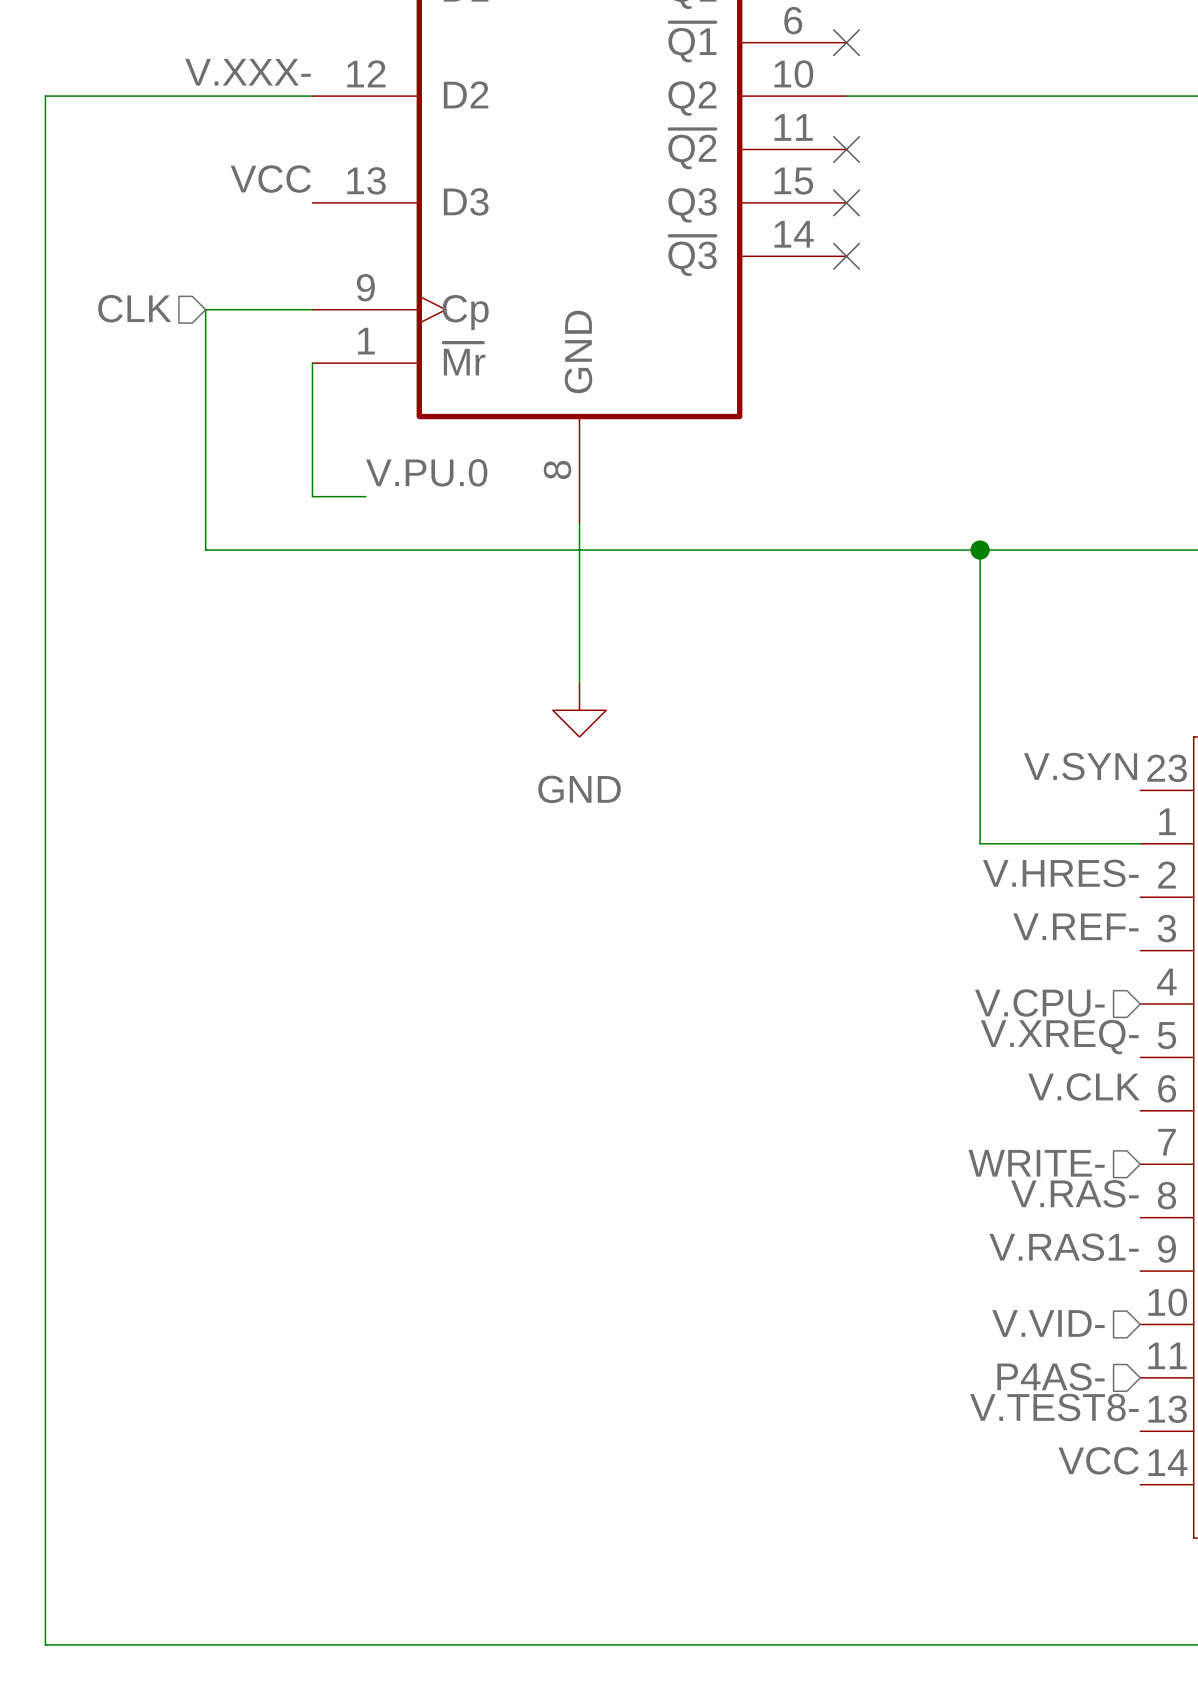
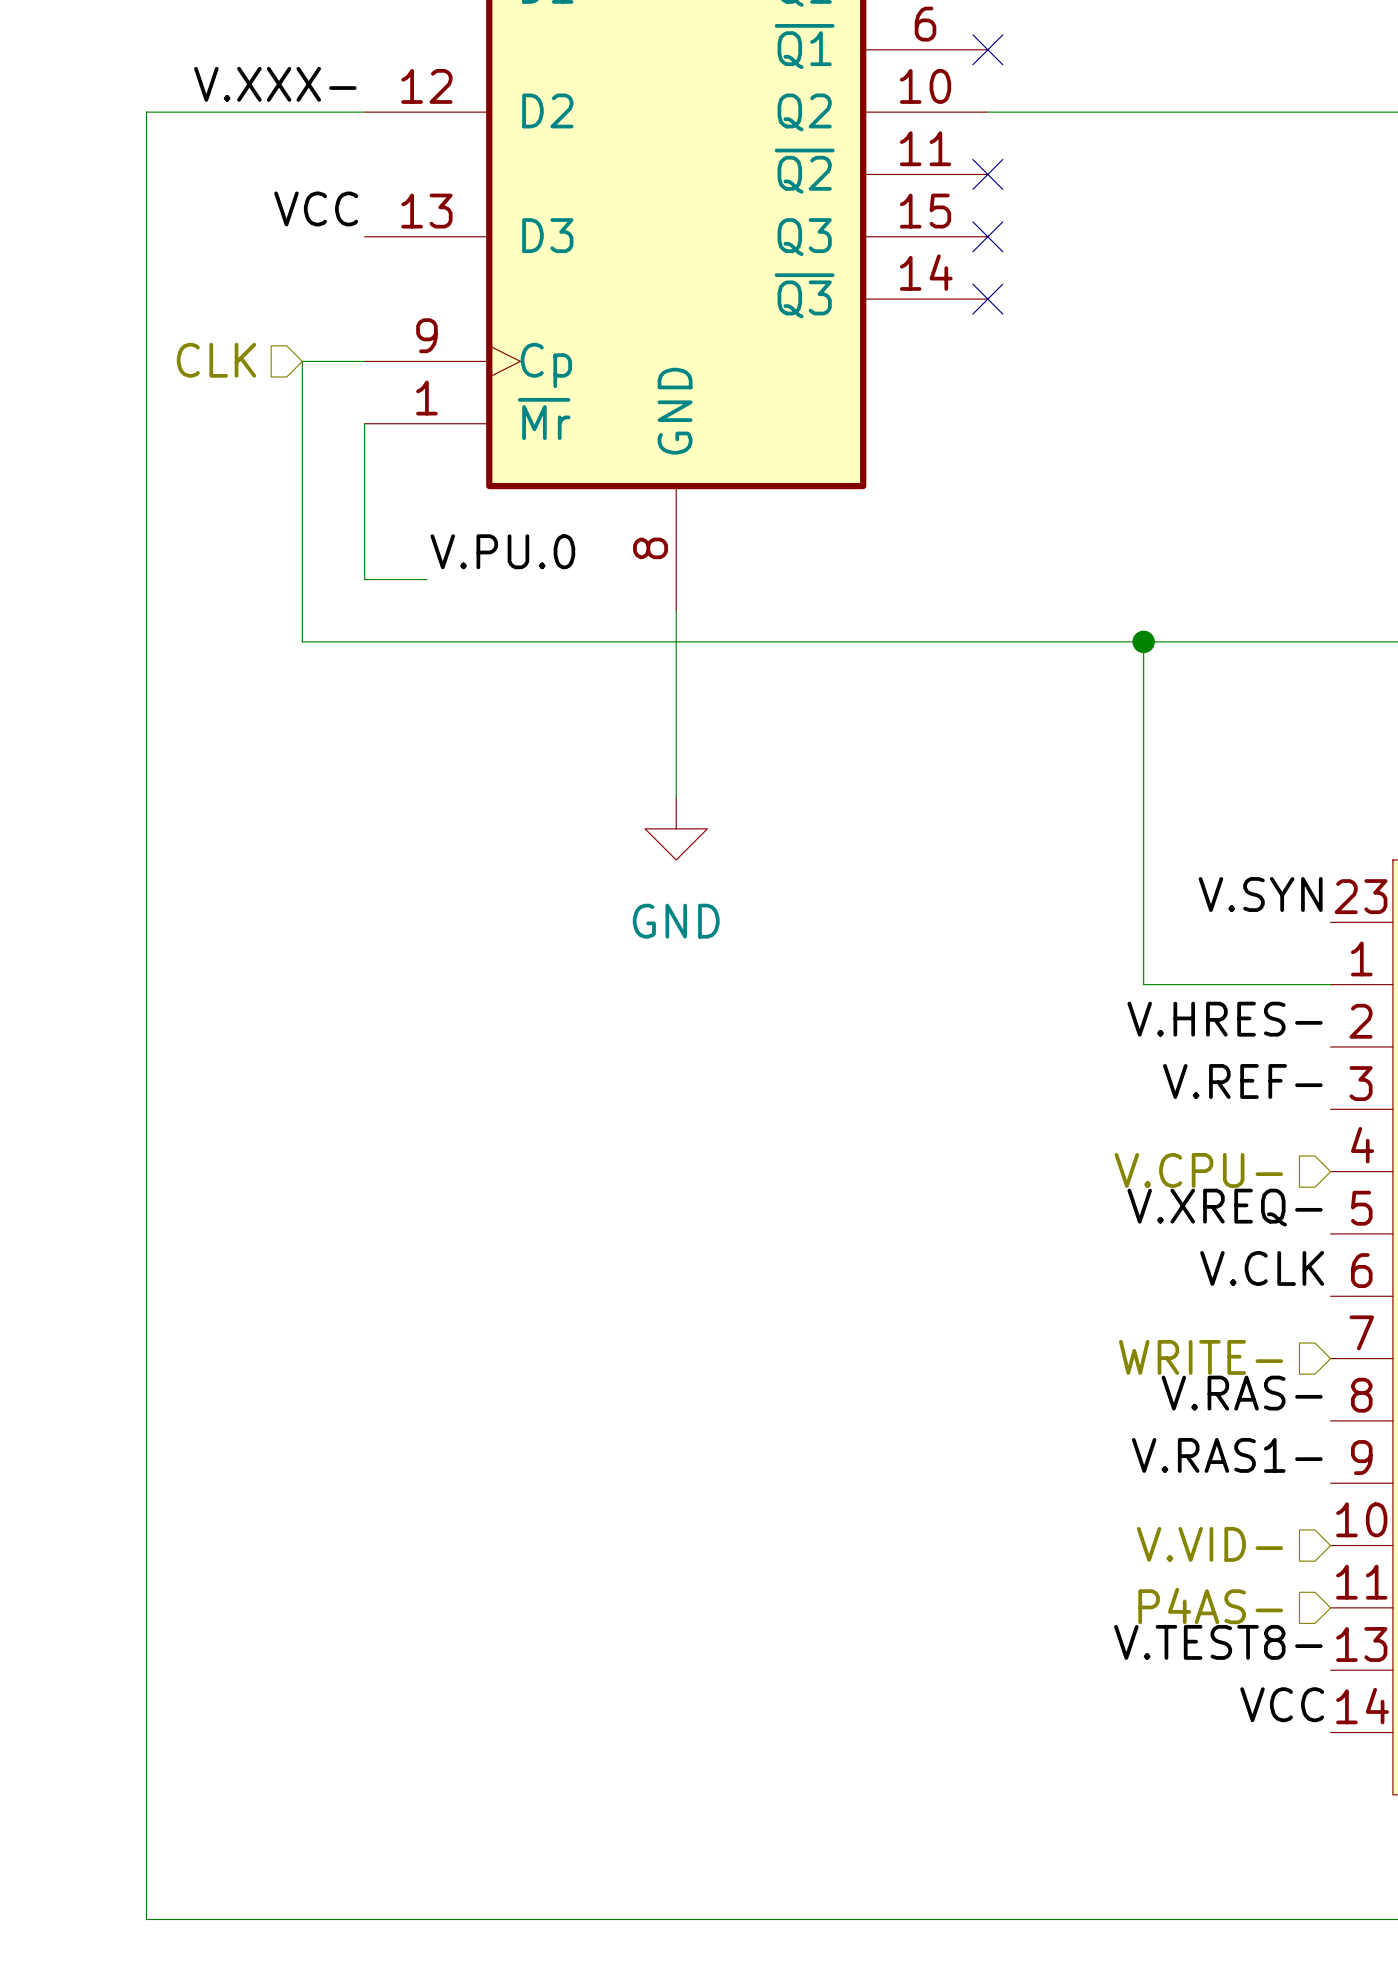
wire: (125, 96) (45, 96) (45, 1644) (125, 1644) -> (146, 112) (146, 1919)
hierarchical label position: CLK (134, 308) -> CLK (216, 360)
wire: (259, 309) (205, 309) (205, 550) (259, 550) -> (302, 361) (302, 641)

